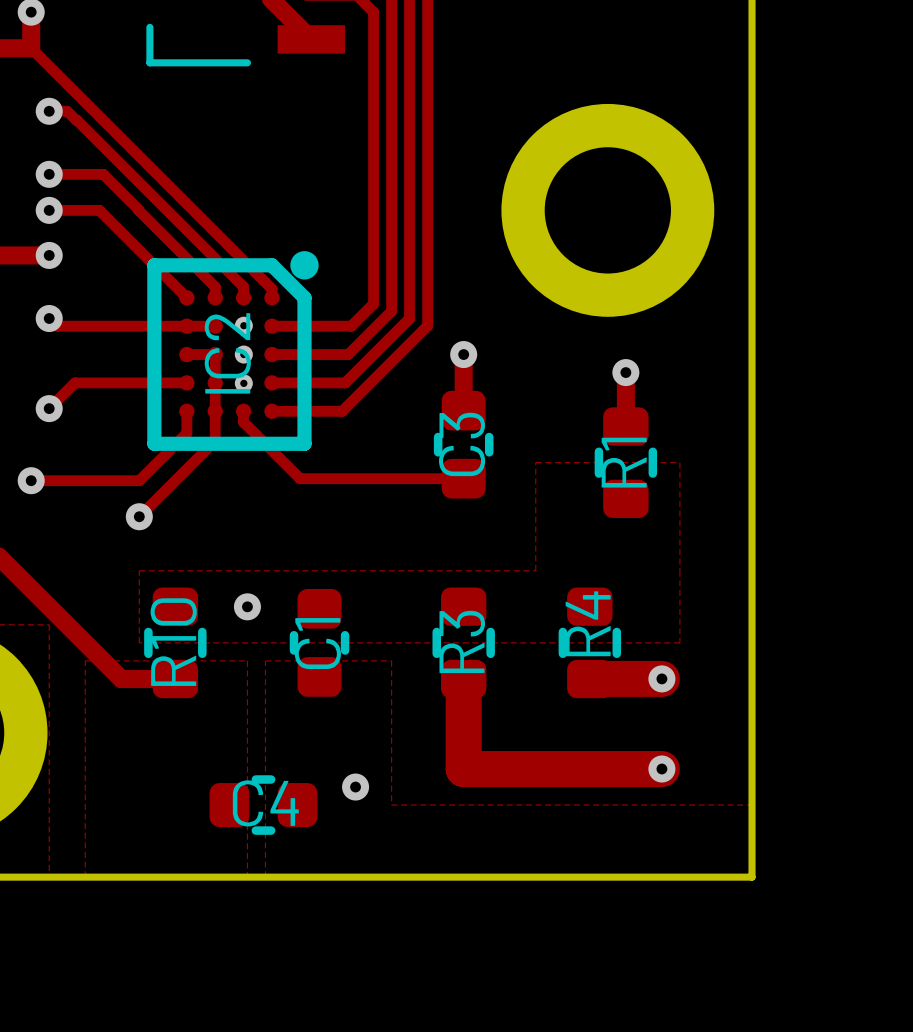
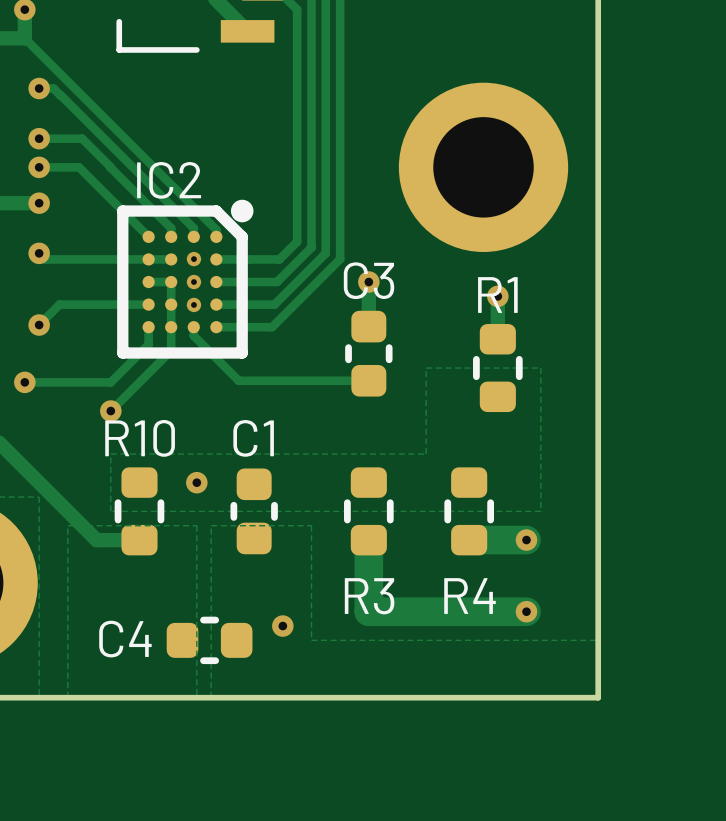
IC2 name rotation: 0° (227, 353) -> 90° clockwise (169, 180)
C3 name rotation: 0° (462, 444) -> 90° clockwise (369, 280)
R1 name rotation: 0° (624, 462) -> 90° clockwise (497, 295)
R4 name rotation: 0° (588, 623) -> 90° clockwise (470, 596)
R4 name position: R4 (588, 623) -> R4 (470, 596)
R3 name rotation: 0° (462, 641) -> 90° clockwise (369, 596)
R10 name rotation: 0° (173, 642) -> 90° clockwise (140, 438)
C1 name rotation: 0° (317, 643) -> 90° clockwise (253, 438)
C4 name position: C4 (265, 803) -> C4 (125, 639)

